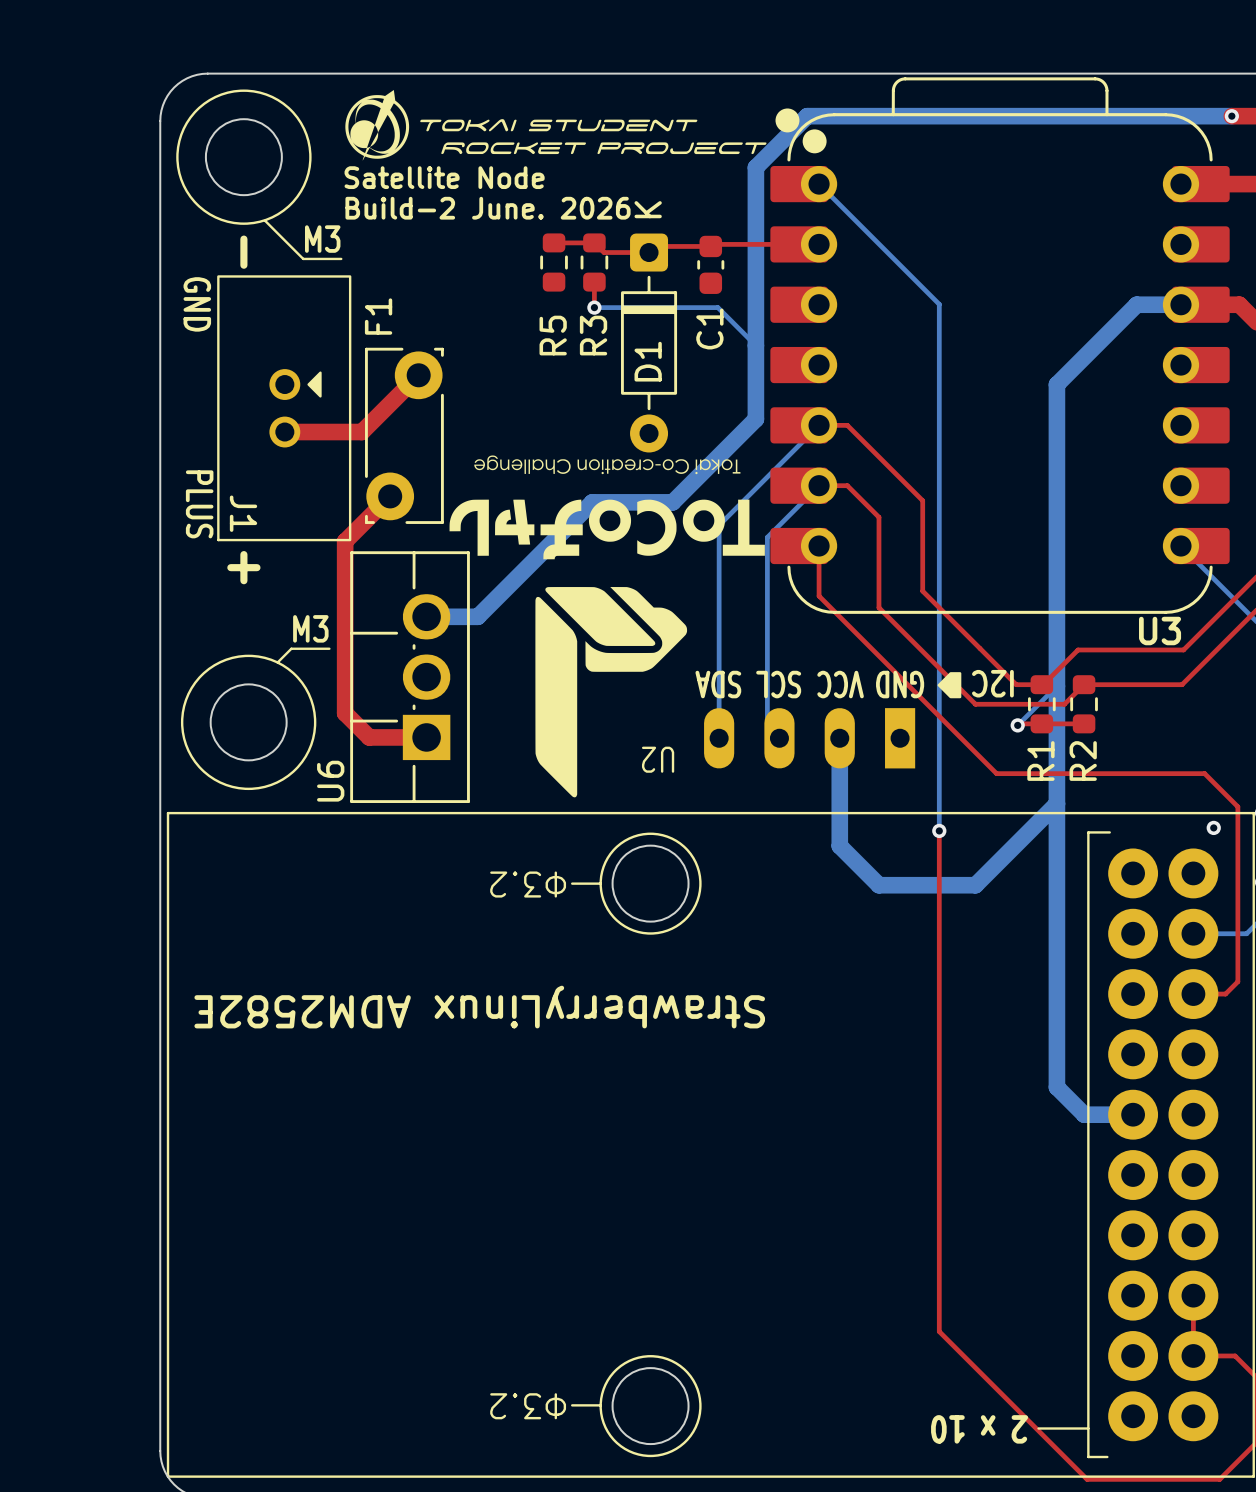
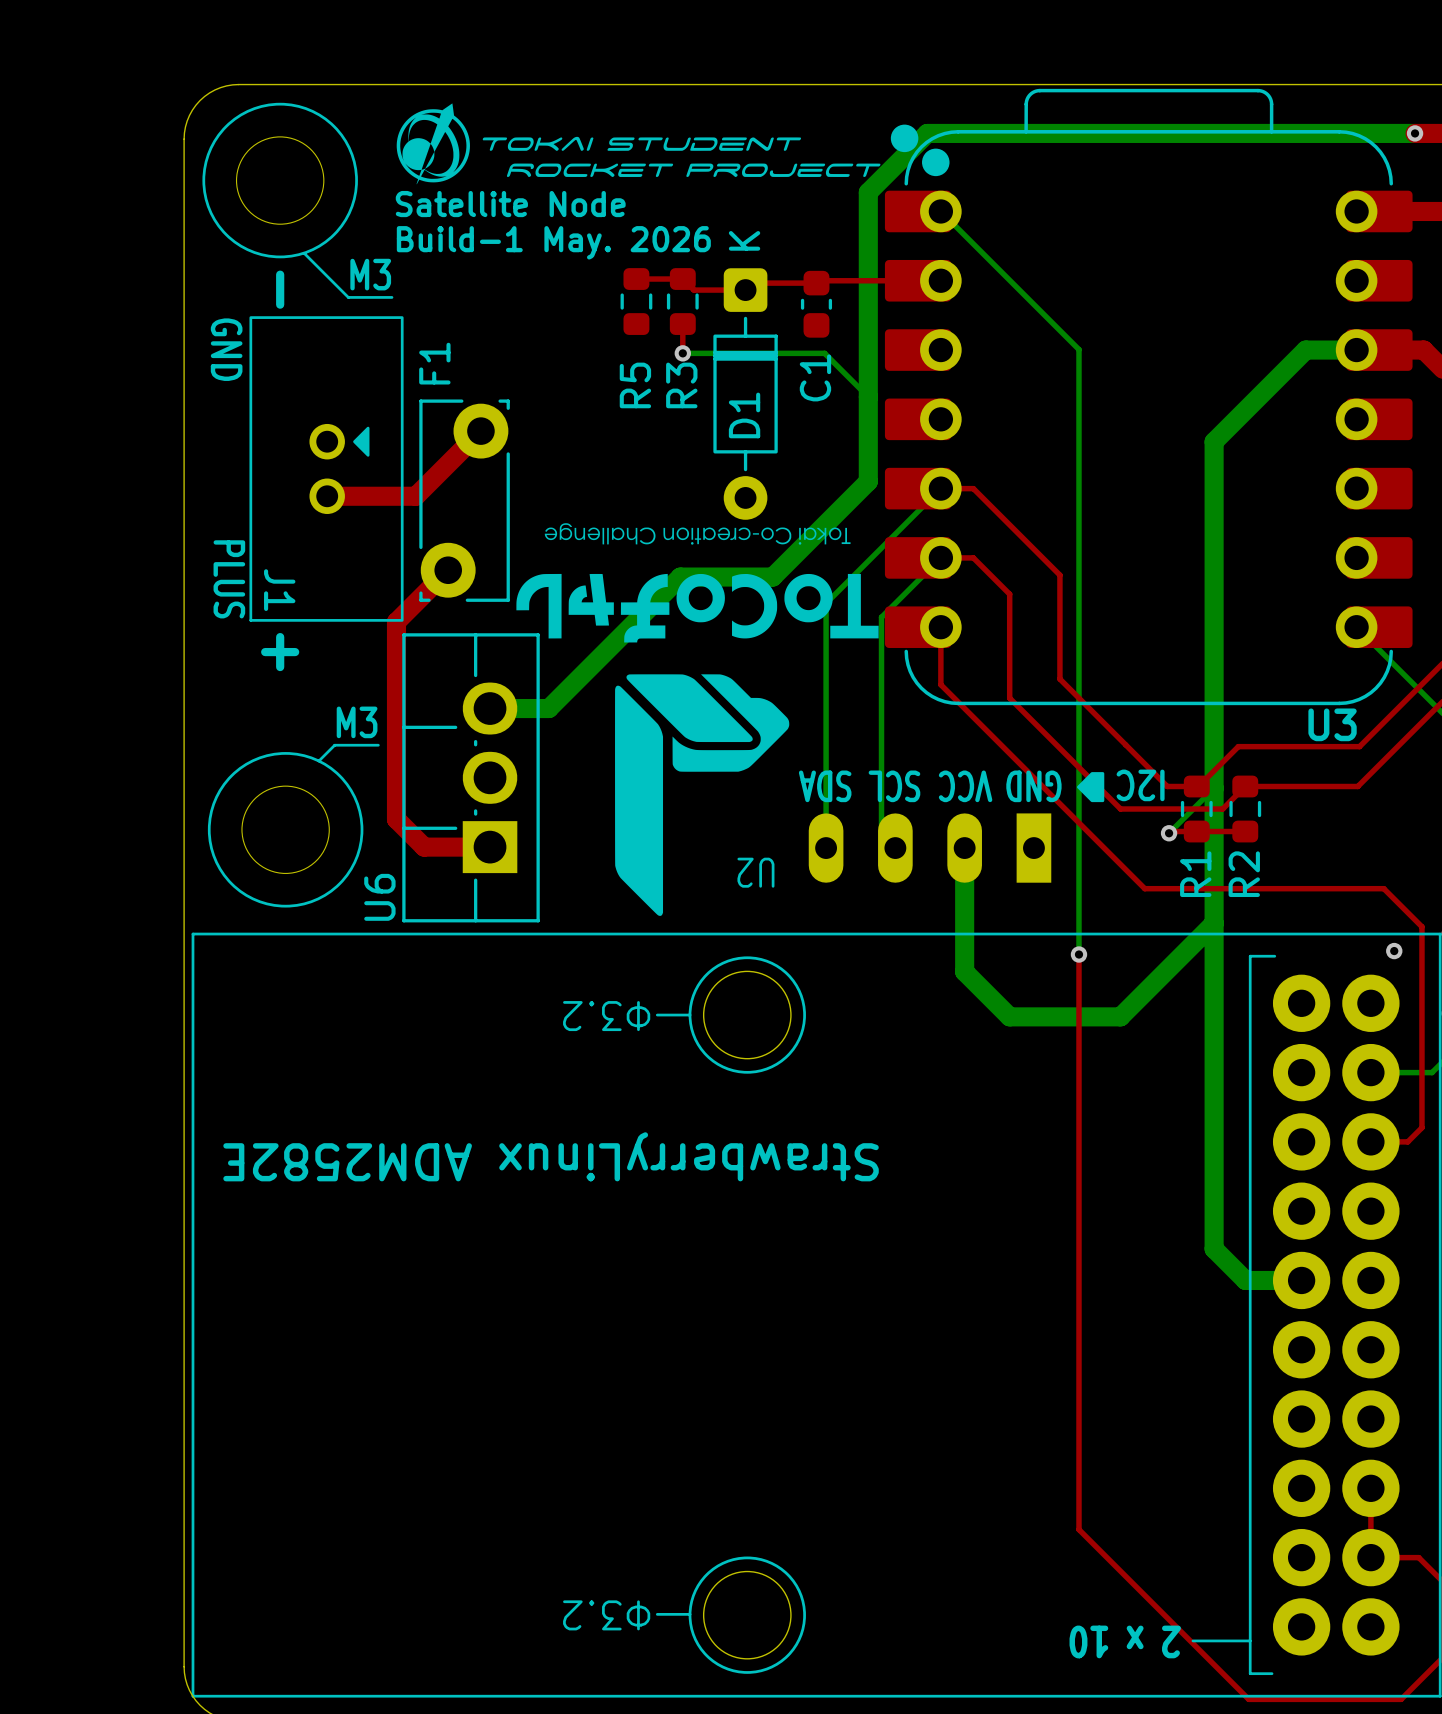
text: Build-2 June. 2026 (488, 208) -> Build-1 May. 2026 (553, 242)

